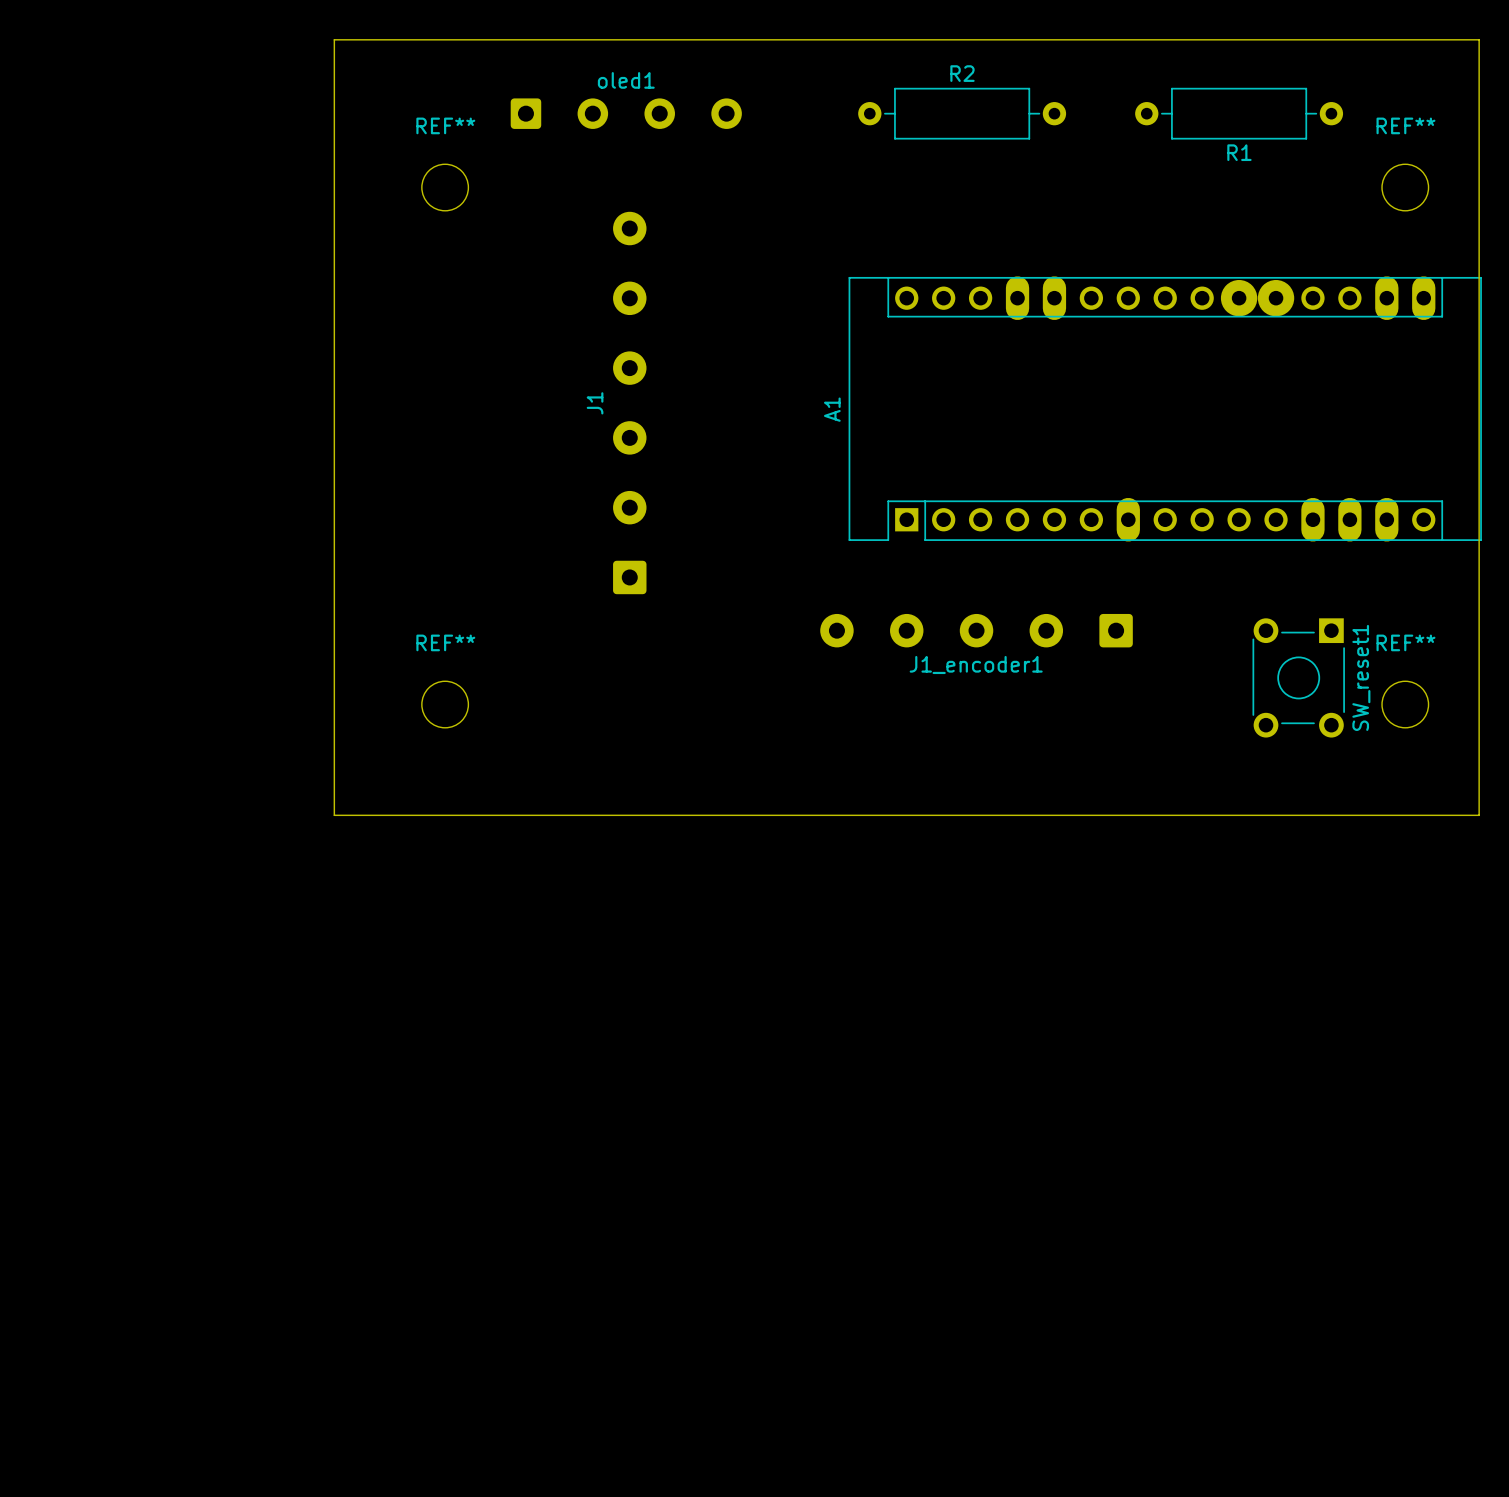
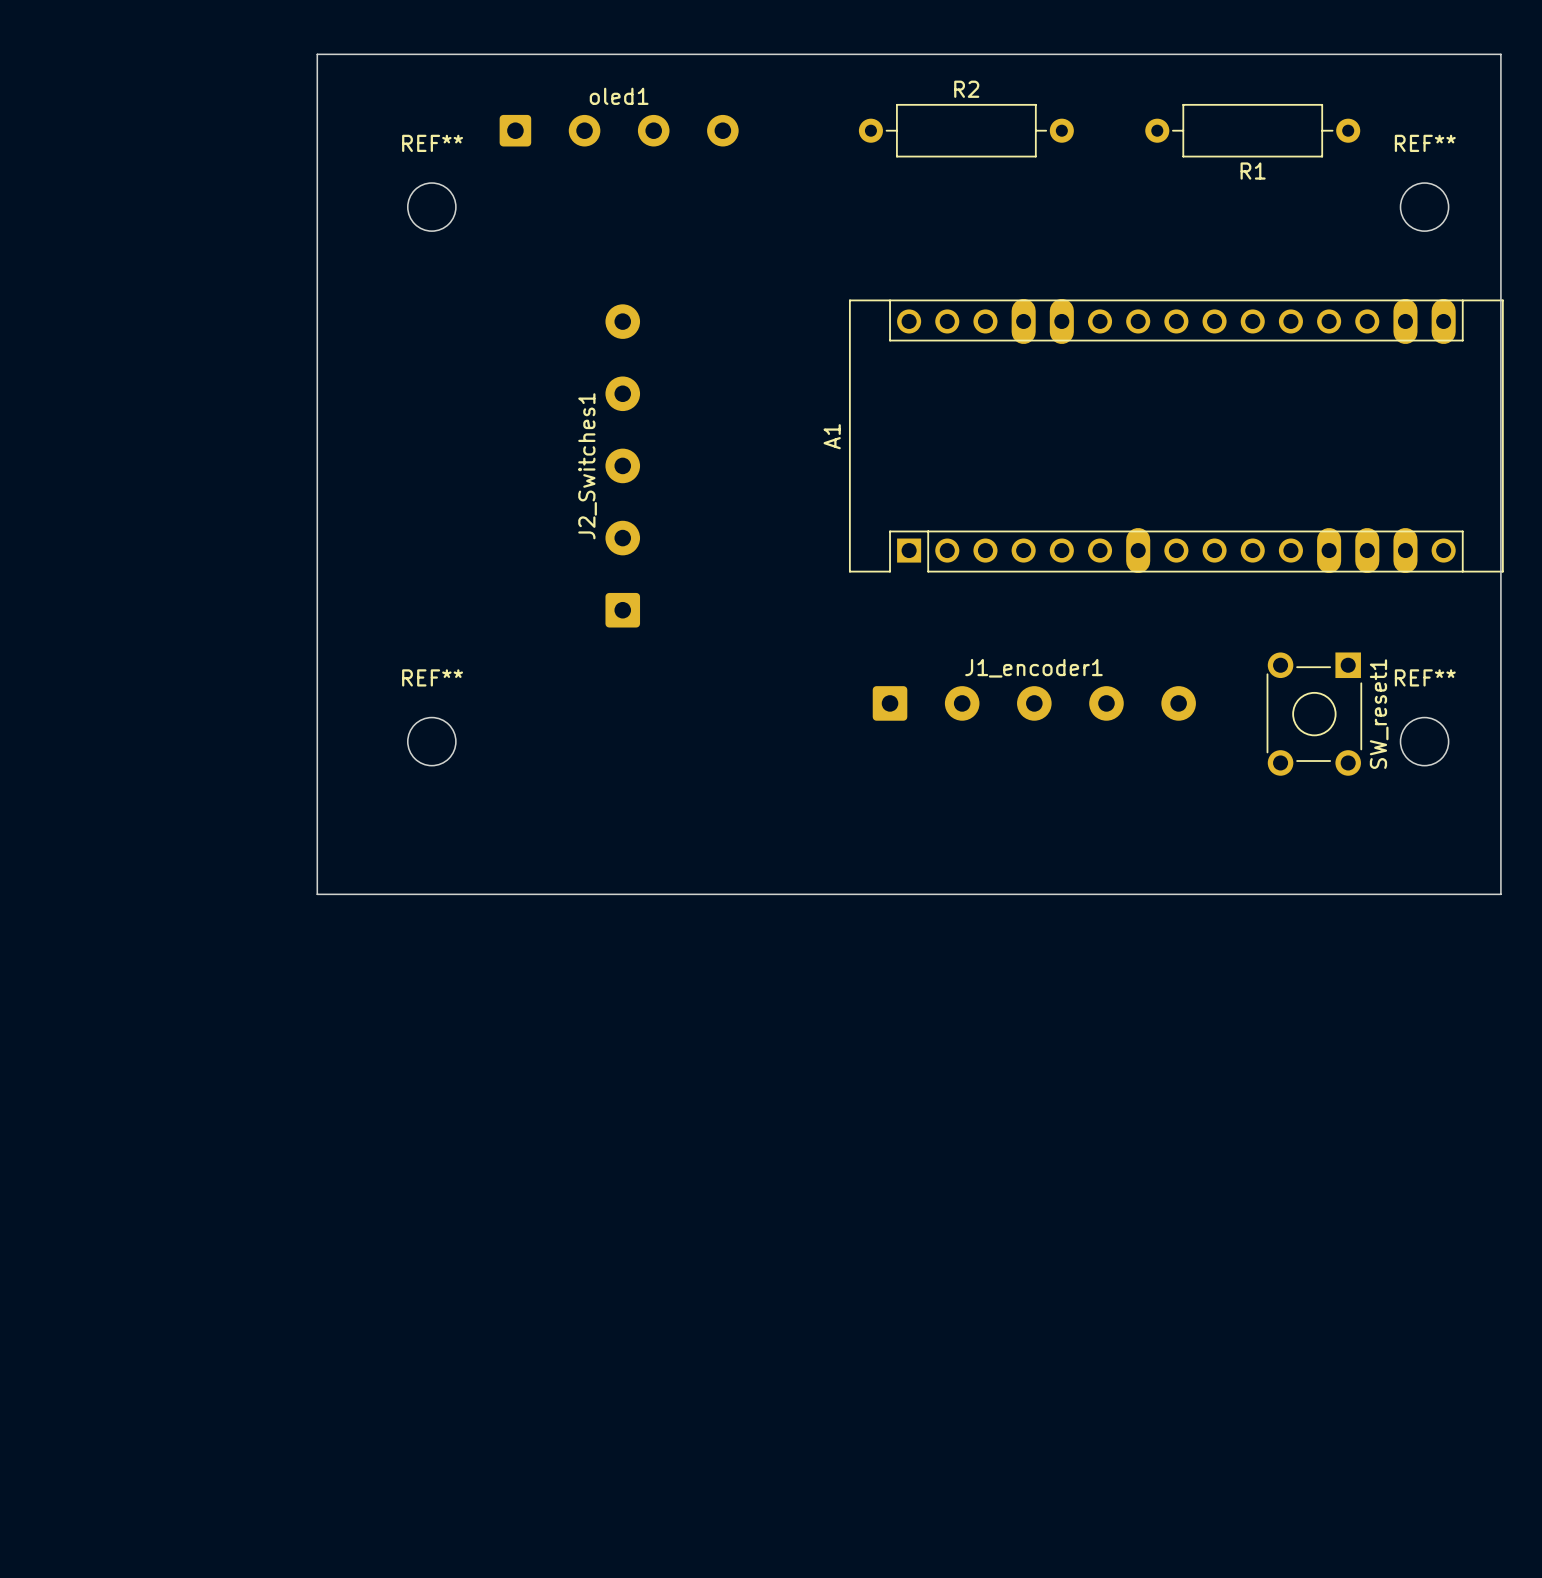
A1 footprint: [848, 276, 1482, 542] -> [848, 298, 1504, 574]
J1: (629, 403) -> none
J2_Switches1: none -> (622, 465)
J1_encoder1 rotation: 0° (976, 630) -> 180° (1034, 703)
board edge: (334, 815) (1479, 815) -> (317, 856) (317, 894) (1500, 894) (1500, 856)

